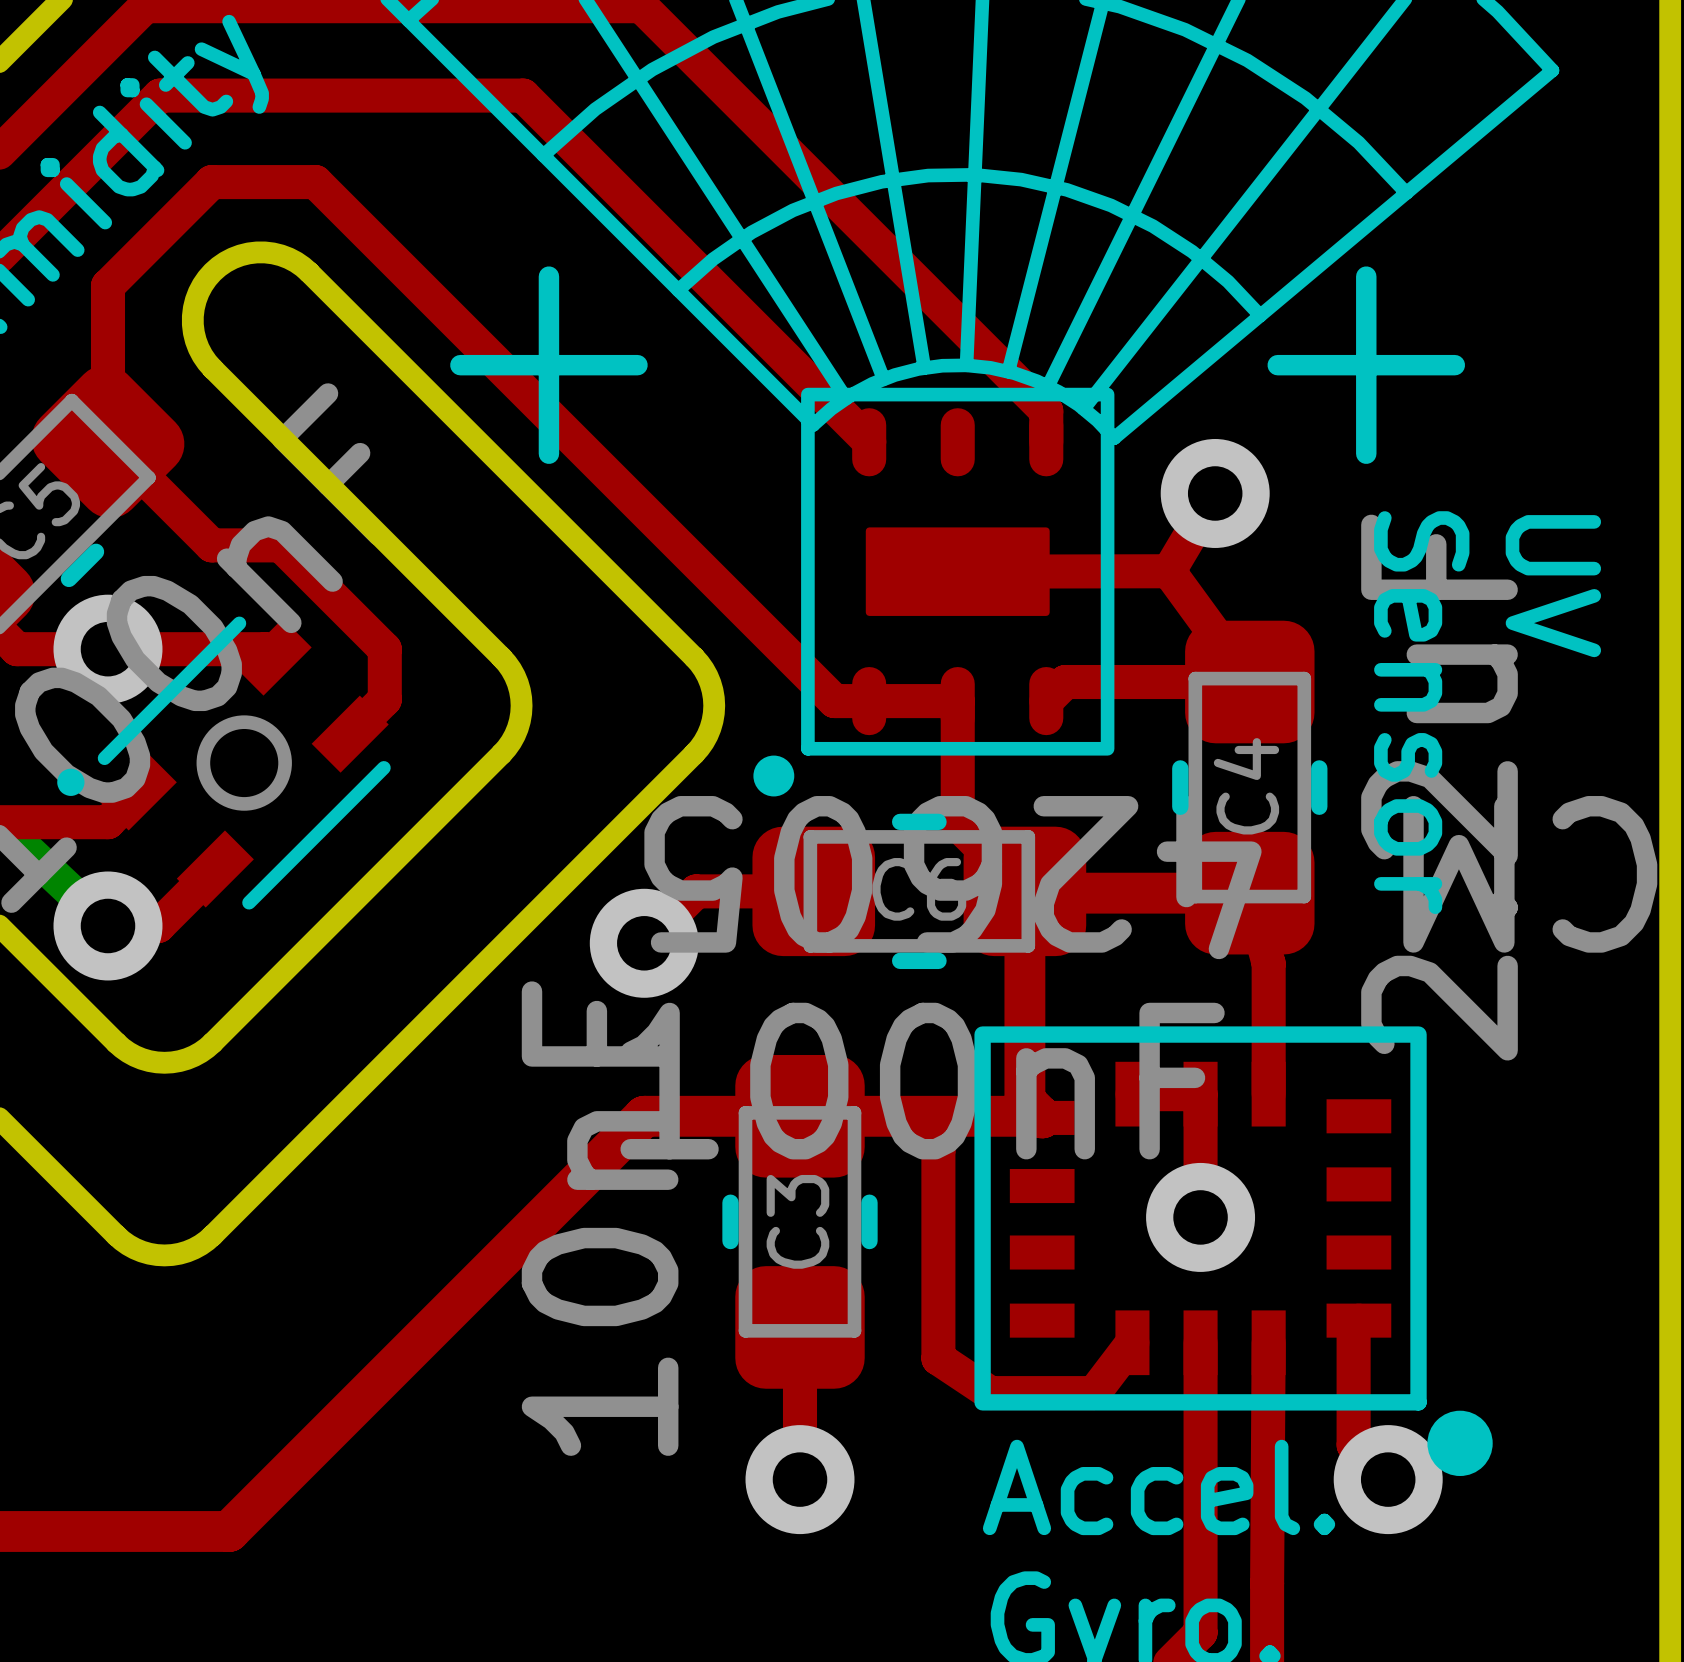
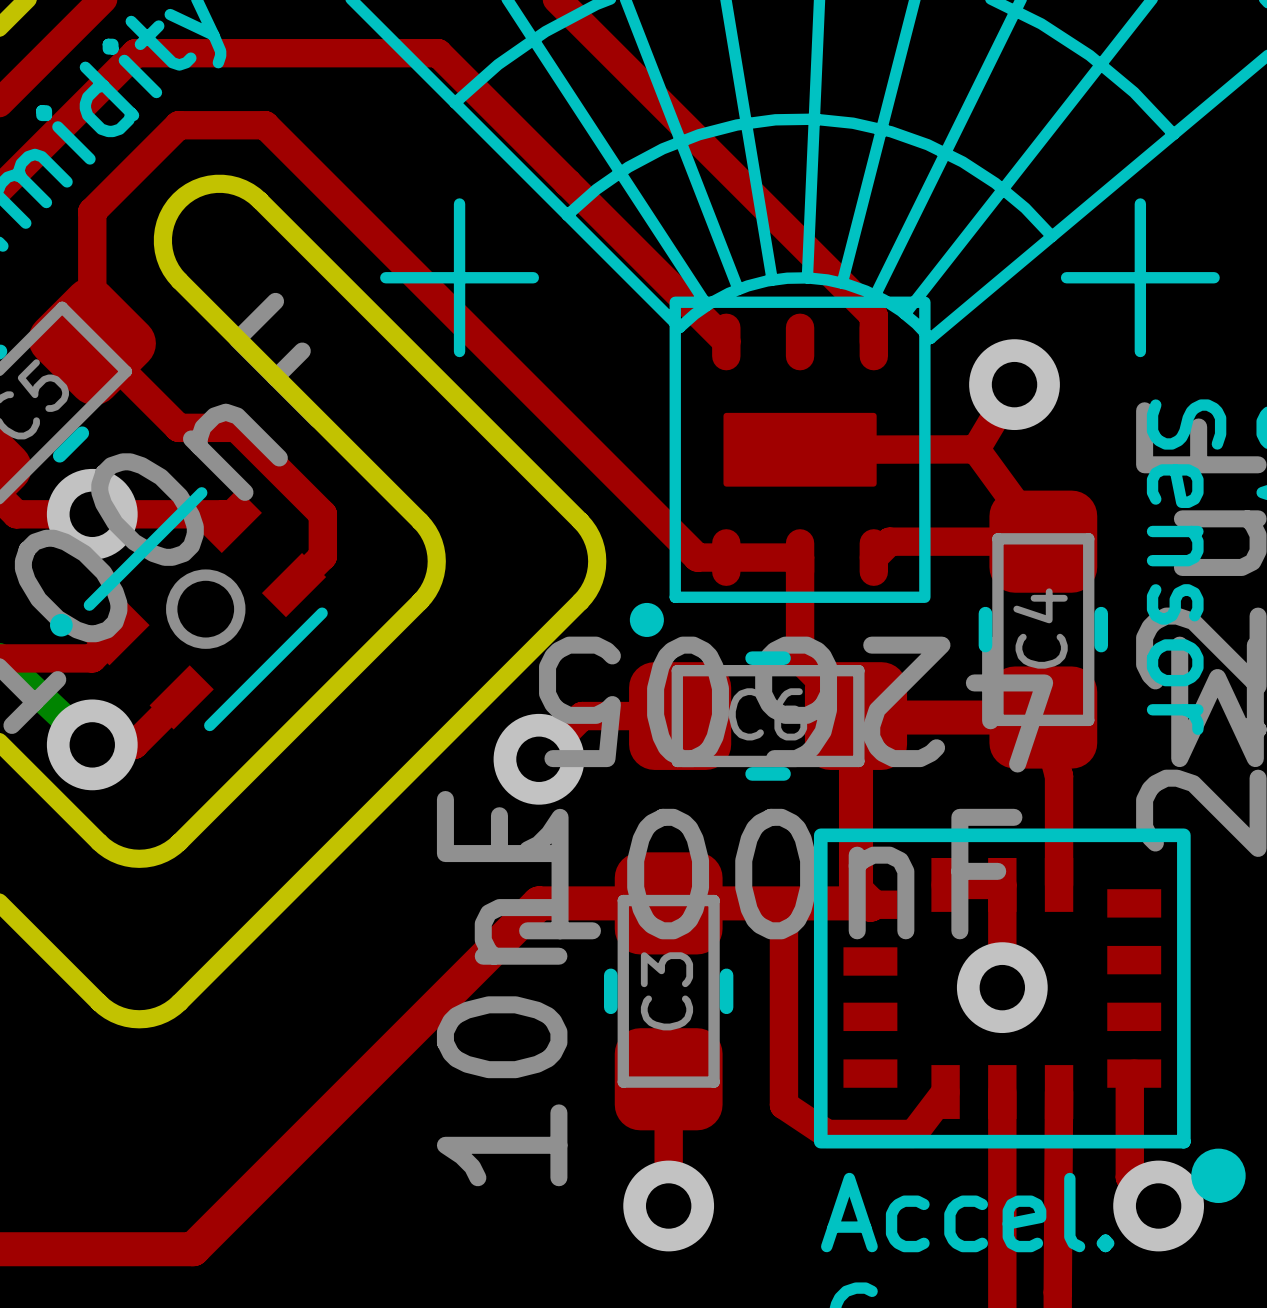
line width: thick (548, 276) (548, 453) -> thin (459, 203) (459, 351)
line width: thick (1366, 276) (1366, 453) -> thin (1140, 203) (1140, 351)
line width: thick (460, 365) (637, 365) -> thin (385, 277) (533, 277)
line width: thick (1277, 365) (1454, 365) -> thin (1066, 277) (1214, 277)

